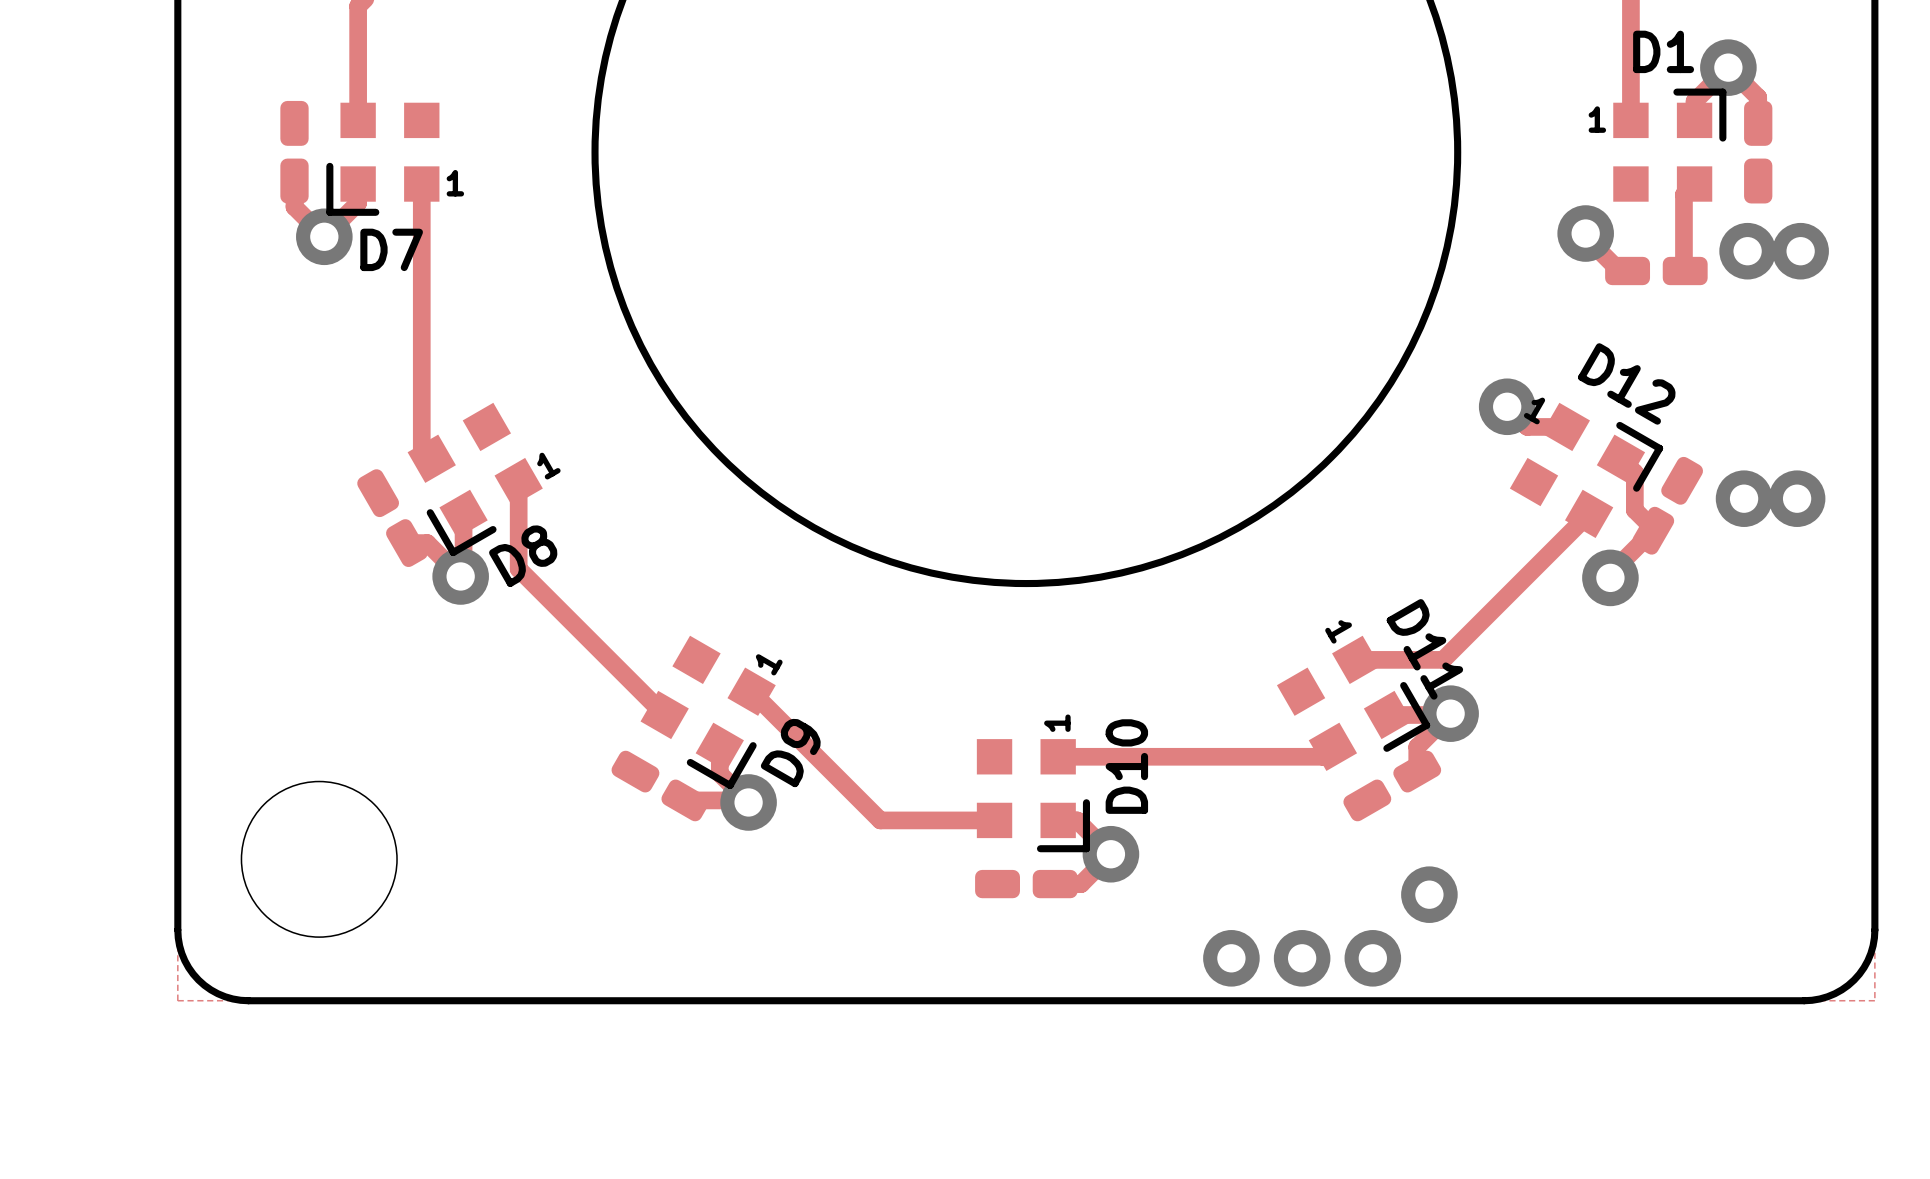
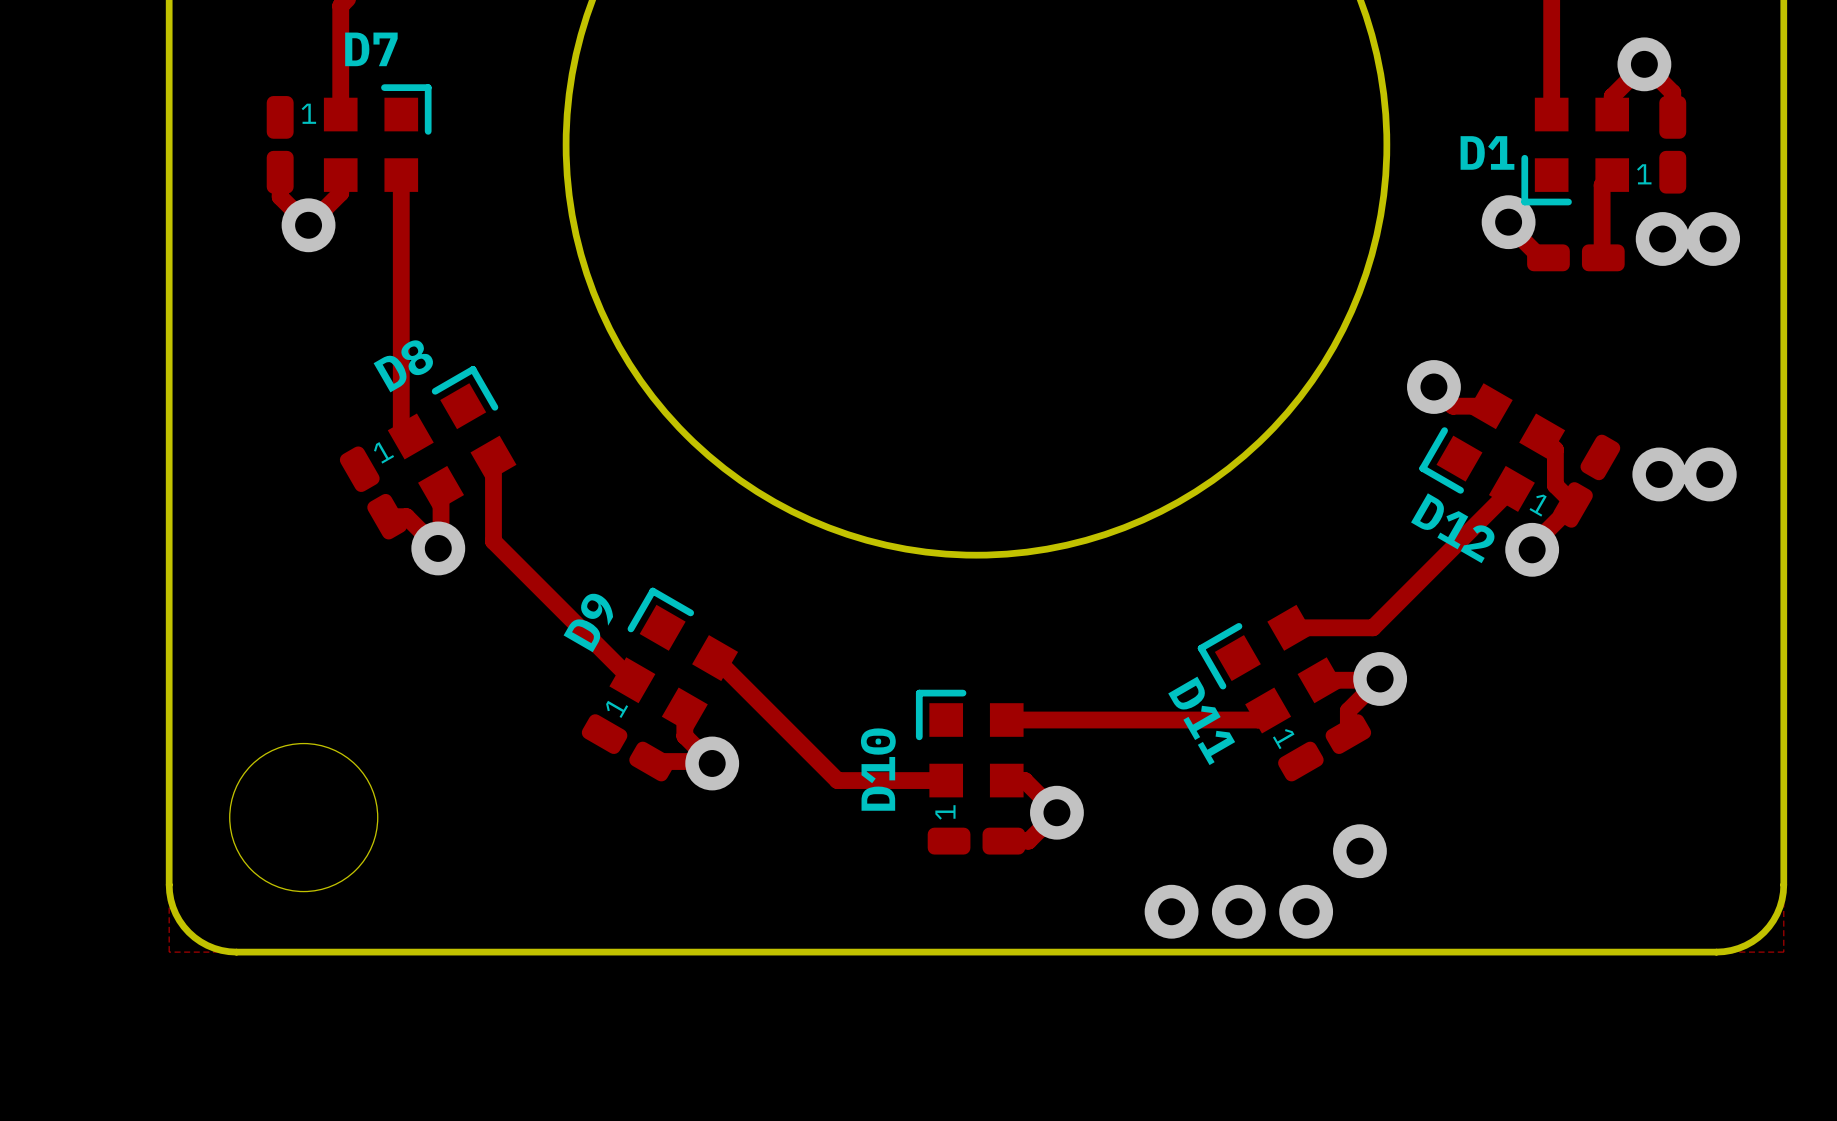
D1 rotation: 0° (1669, 145) -> 180° (1575, 151)
D7 rotation: 0° (382, 159) -> 180° (377, 138)
D12 rotation: 0° (1586, 470) -> 180° (1492, 447)
D8 rotation: 0° (475, 479) -> 180° (452, 438)
D11 rotation: 0° (1353, 703) -> 180° (1270, 669)
D9 rotation: 0° (708, 712) -> 180° (673, 660)
D10 rotation: 0° (1033, 795) -> 180° (969, 743)

